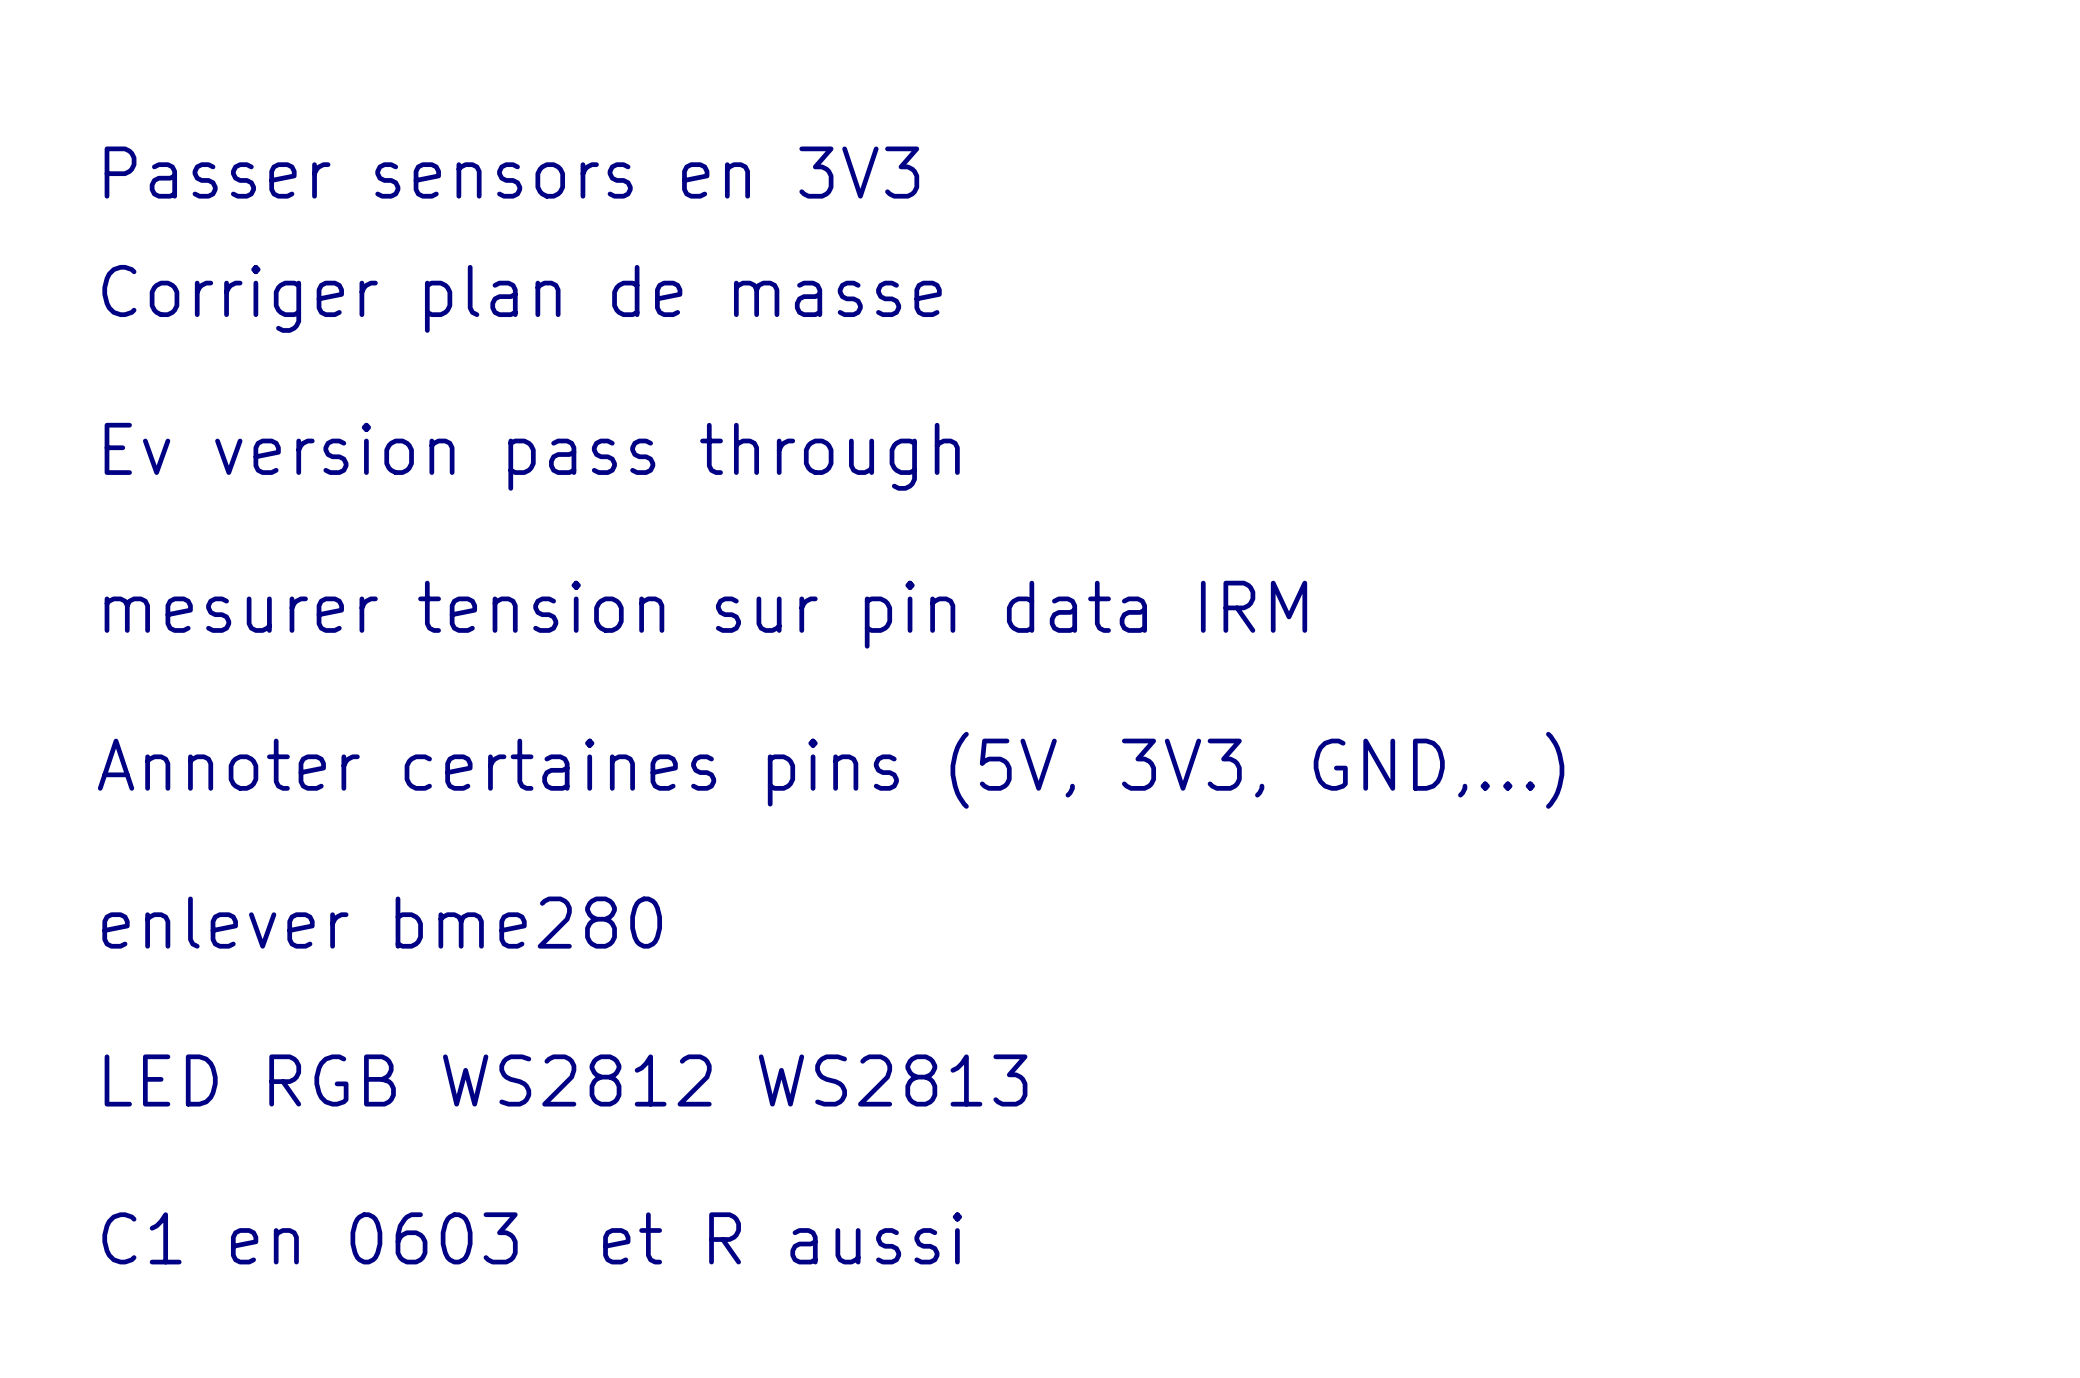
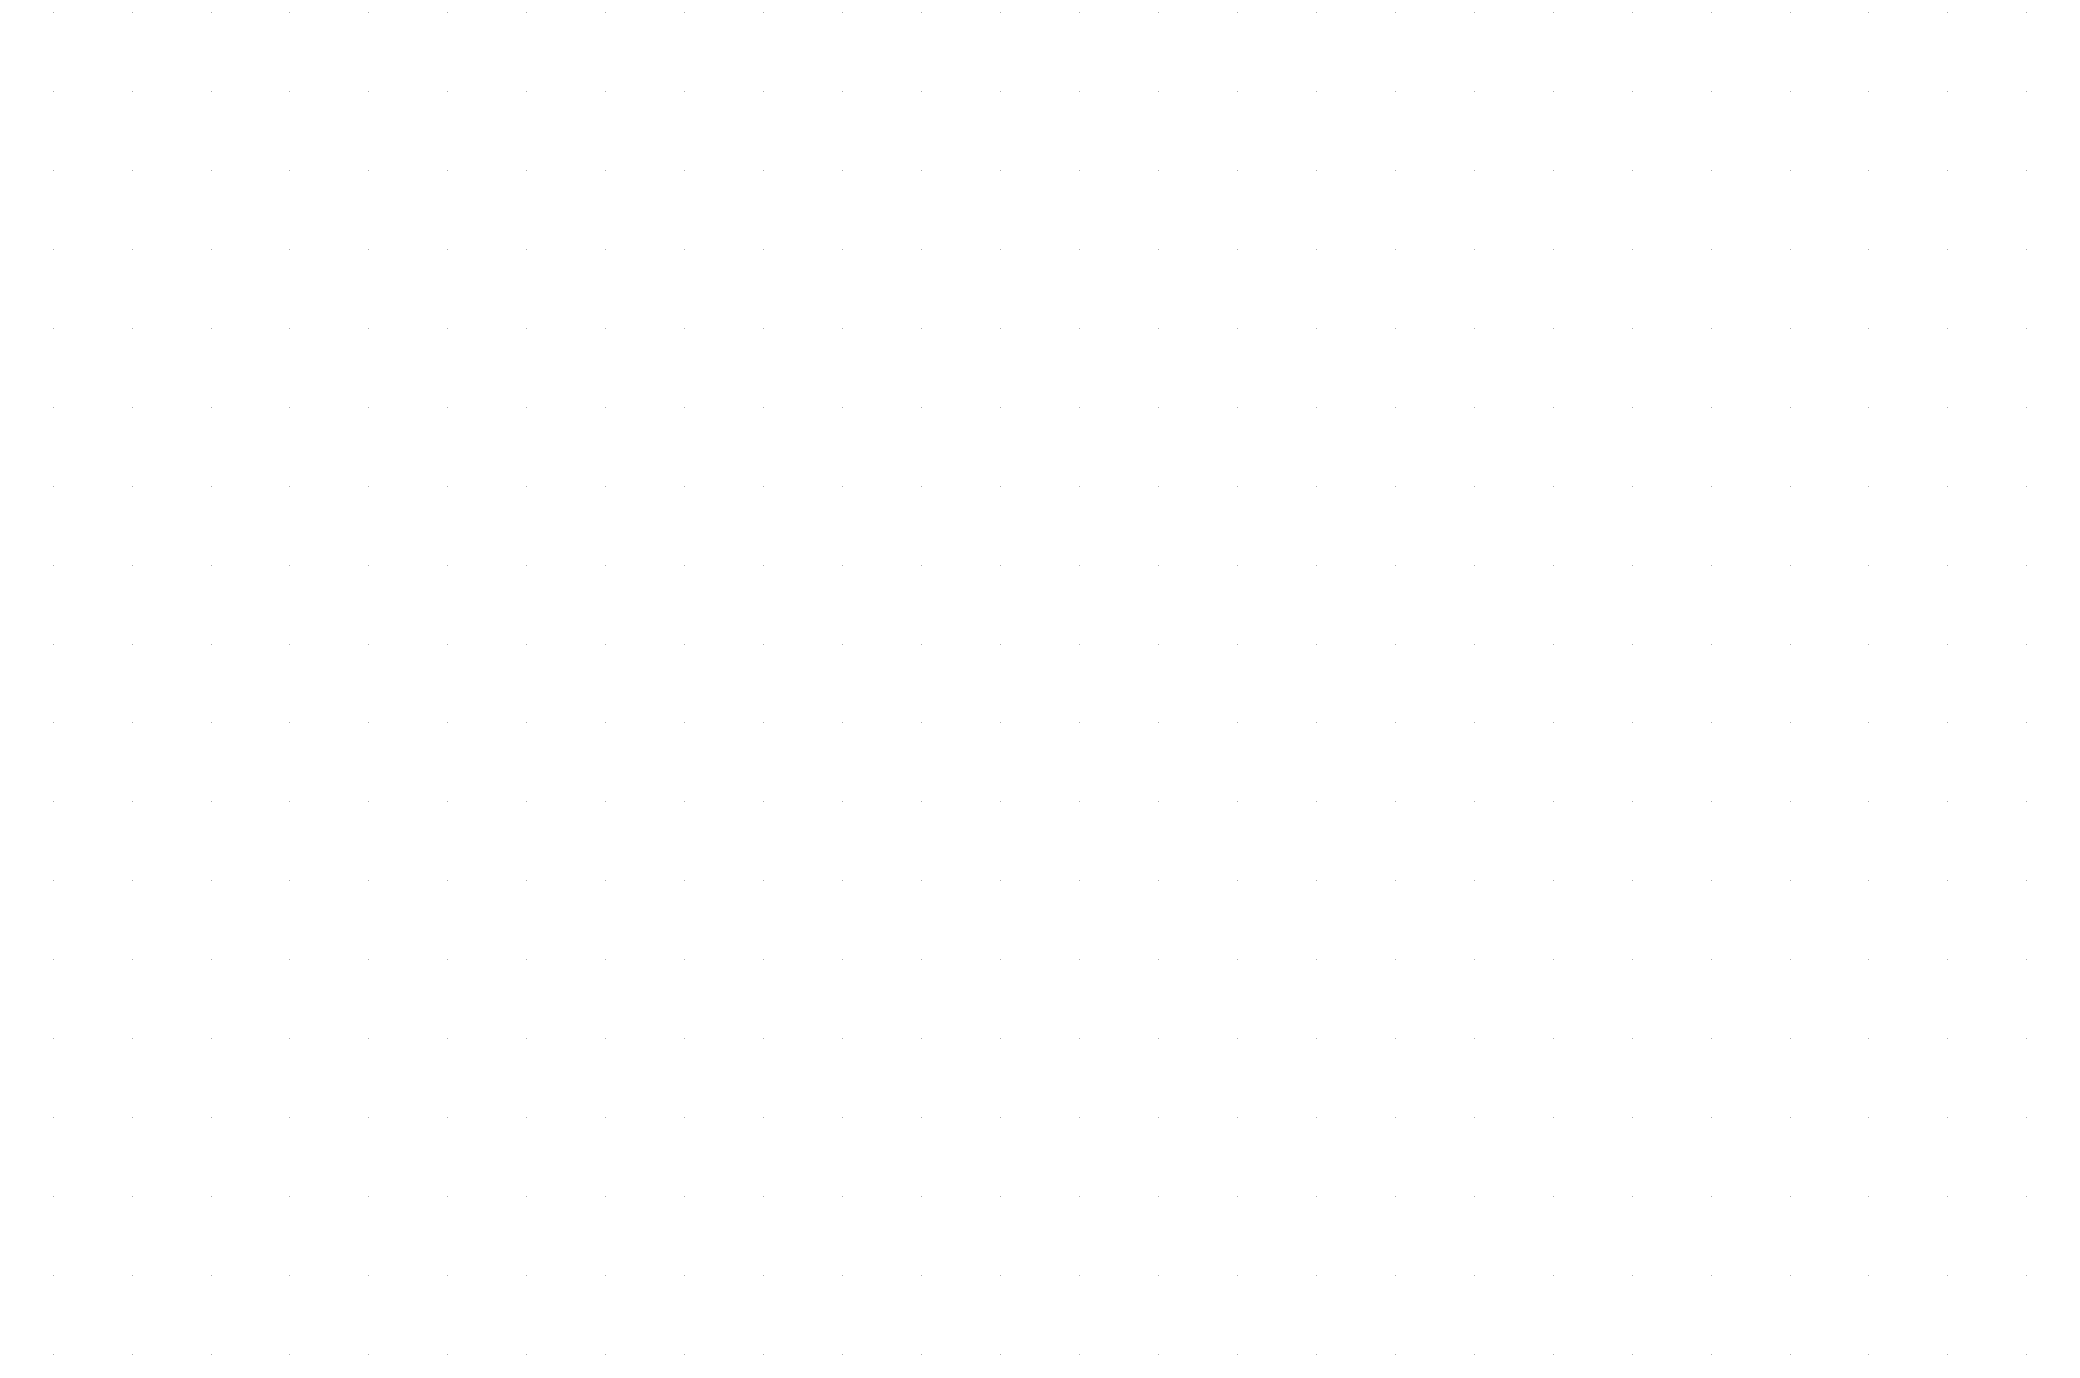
text: Passer sensors en 3V3 (511, 172) -> none
text: Corriger plan de masse (522, 298) -> none
text: Ev version pass through (532, 456) -> none
text: mesurer tension sur pin data IRM (705, 614) -> none
text: Annoter certaines pins (5V, 3V3, GND,...) (831, 770) -> none
text: enlever bme280 (382, 922) -> none
text: LED RGB WS2812 WS2813 (566, 1080) -> none
text: C1 en 0603 et R aussi (532, 1238) -> none

